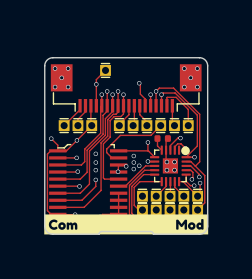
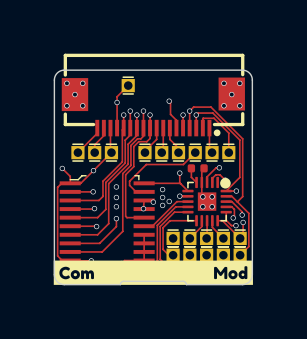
part footprint: [50, 64, 202, 113] -> [61, 53, 245, 137]

